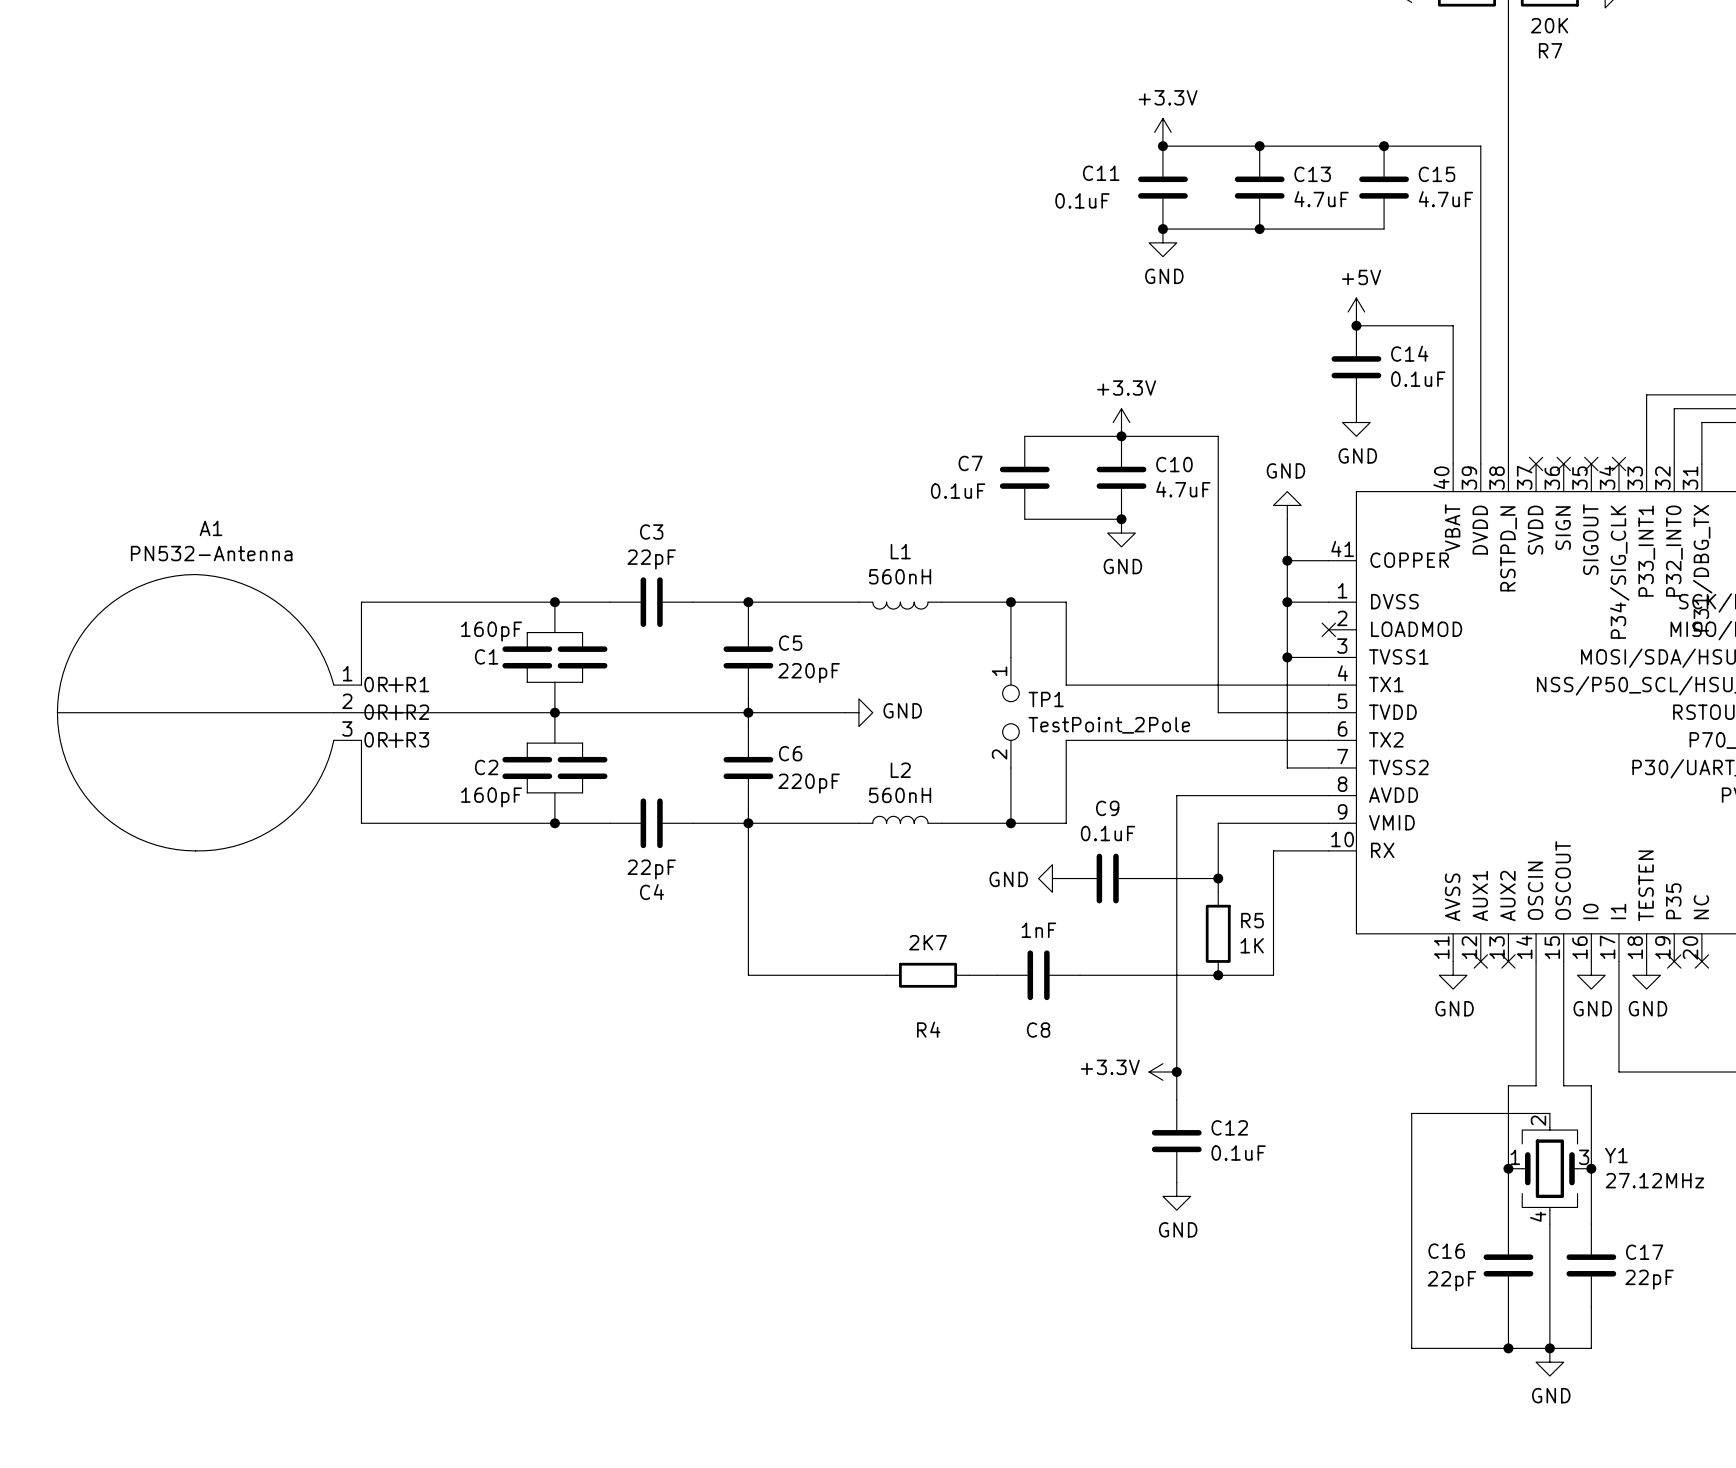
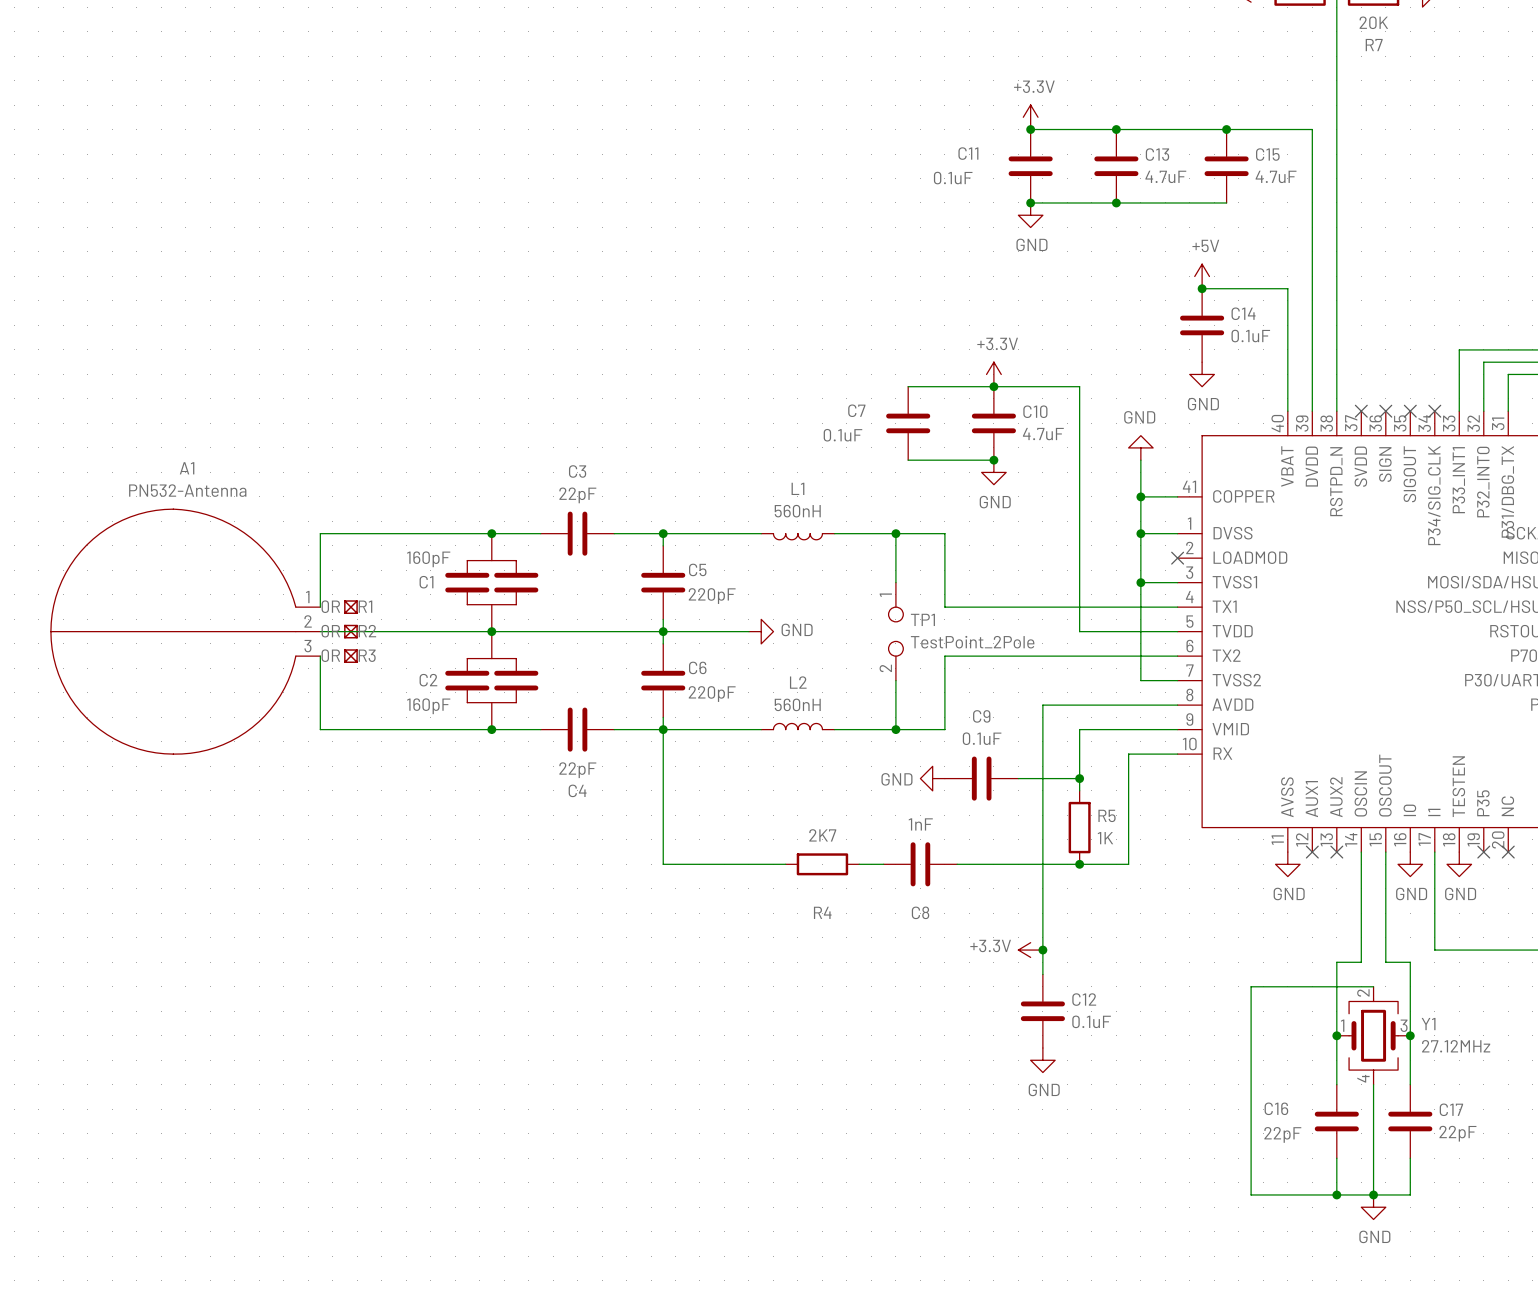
R1 symbol: [388, 677, 404, 693] -> [344, 600, 358, 614]
R2 symbol: [388, 704, 404, 721] -> [344, 624, 358, 639]
R3 symbol: [388, 732, 404, 749] -> [344, 649, 358, 663]

